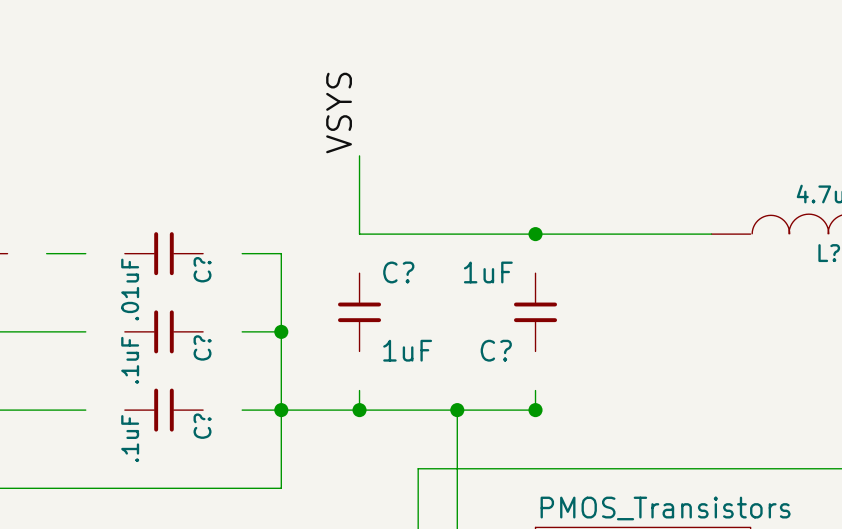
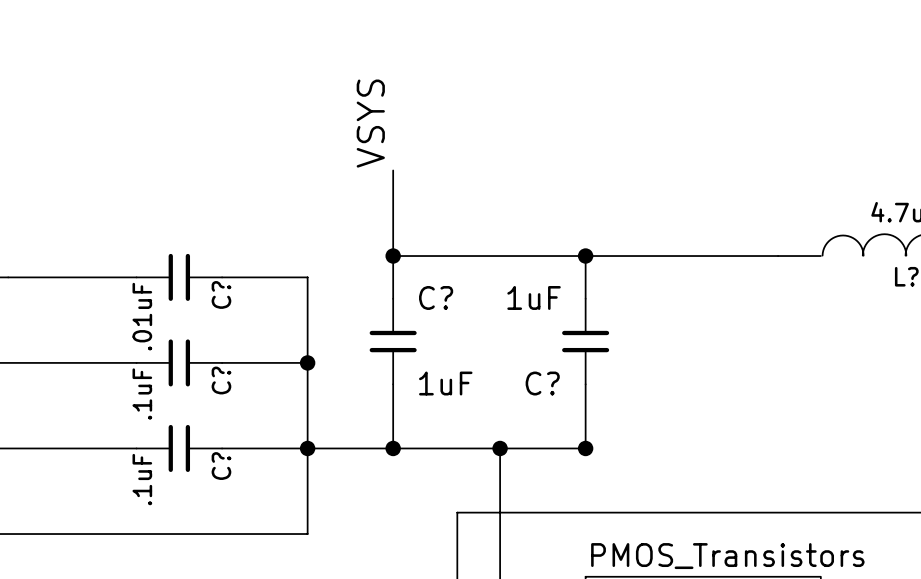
wire: none -> (393, 256) (393, 298)
junction: none -> (393, 256)
wire: none -> (585, 256) (585, 298)
wire: none -> (8, 277) (51, 277)
wire: none -> (93, 277) (136, 277)
wire: none -> (222, 277) (264, 277)
wire: none -> (93, 362) (136, 362)
wire: none -> (222, 362) (264, 362)
wire: none -> (393, 384) (393, 427)
wire: none -> (585, 384) (585, 427)
wire: none -> (93, 448) (136, 448)
wire: none -> (222, 448) (264, 448)

